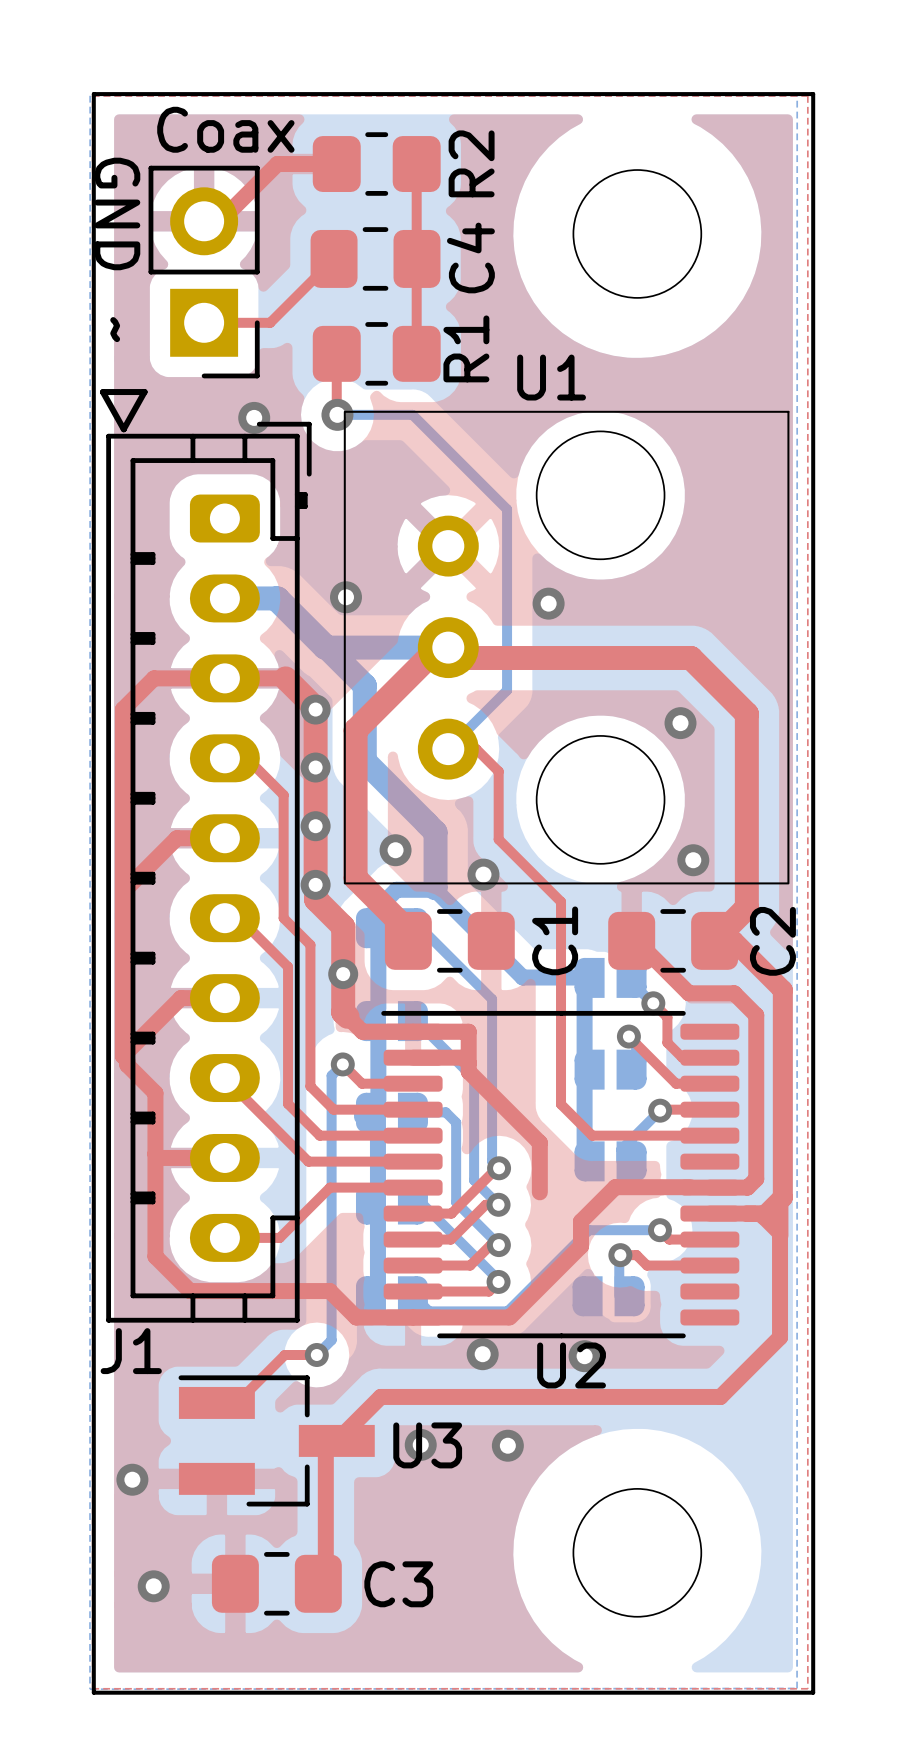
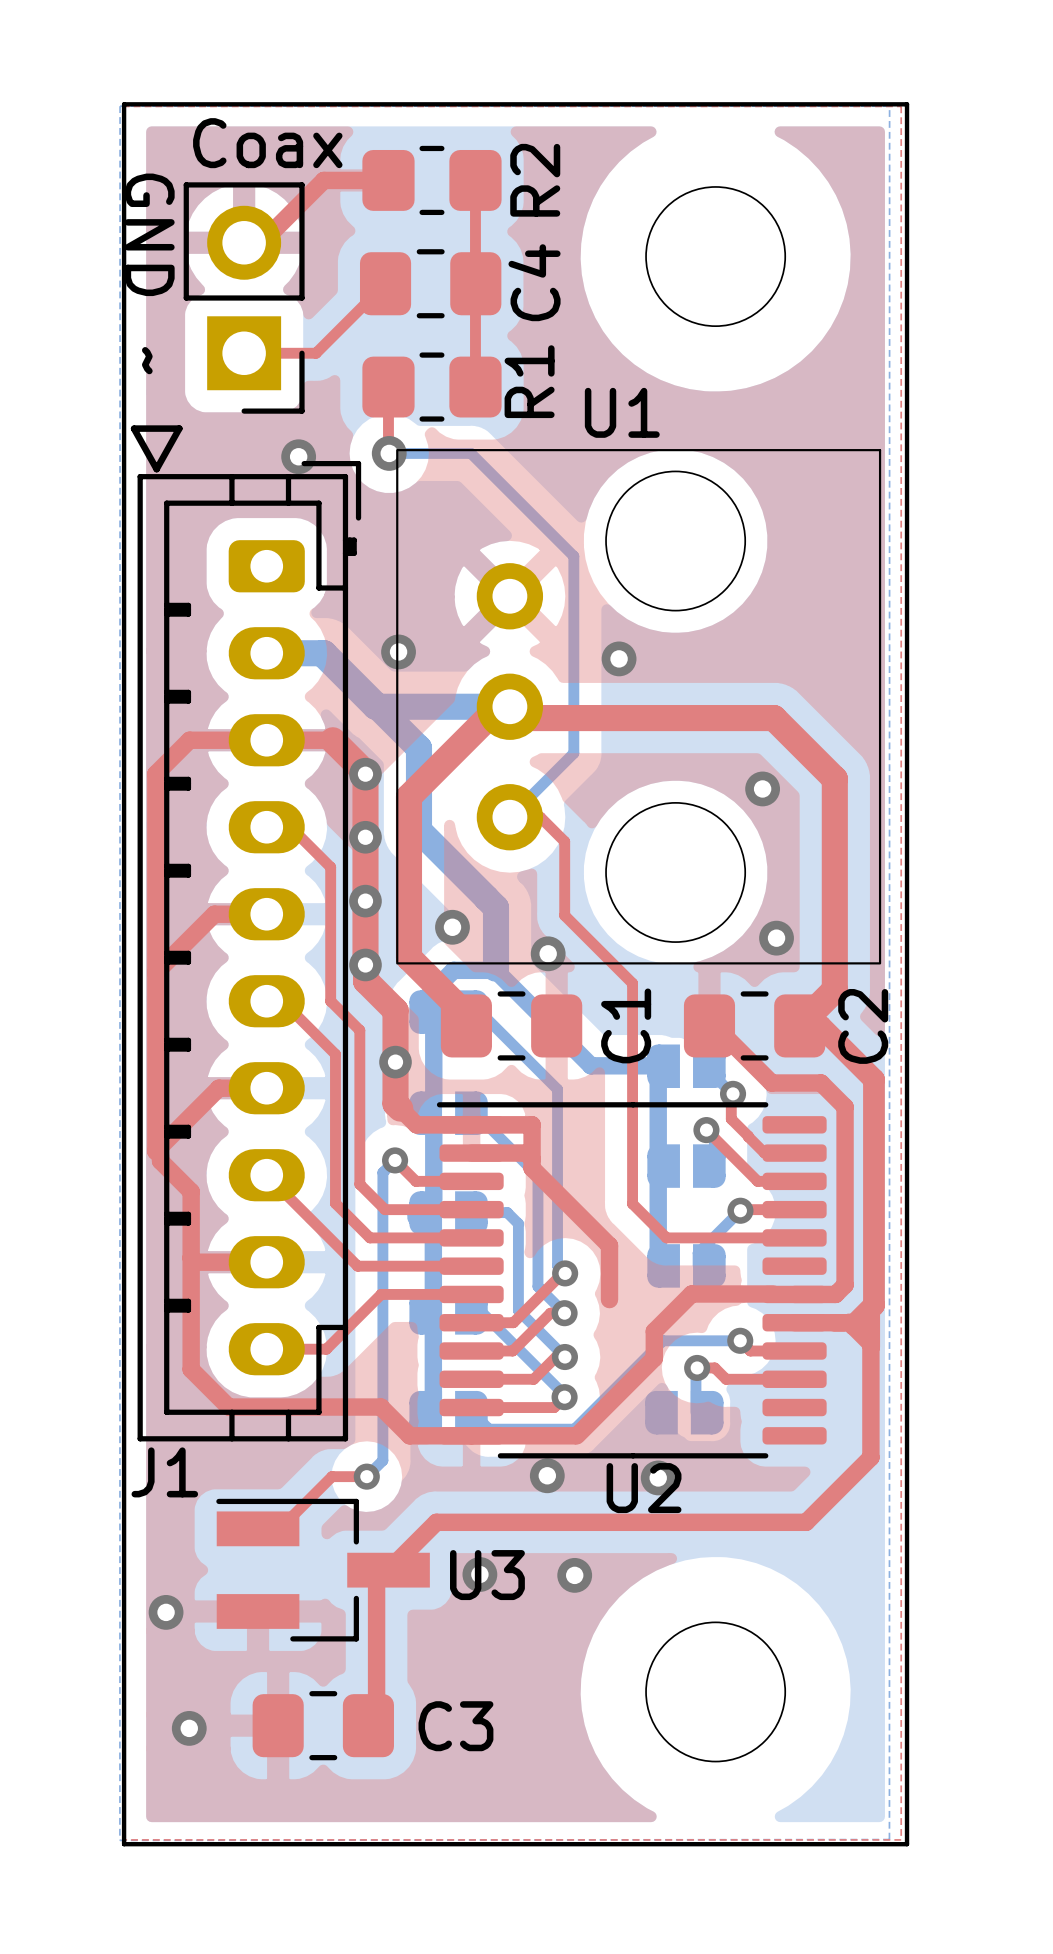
top track: (653, 1003) (667, 1017) (667, 1042) -> (731, 1094) (731, 1119) (748, 1136)

